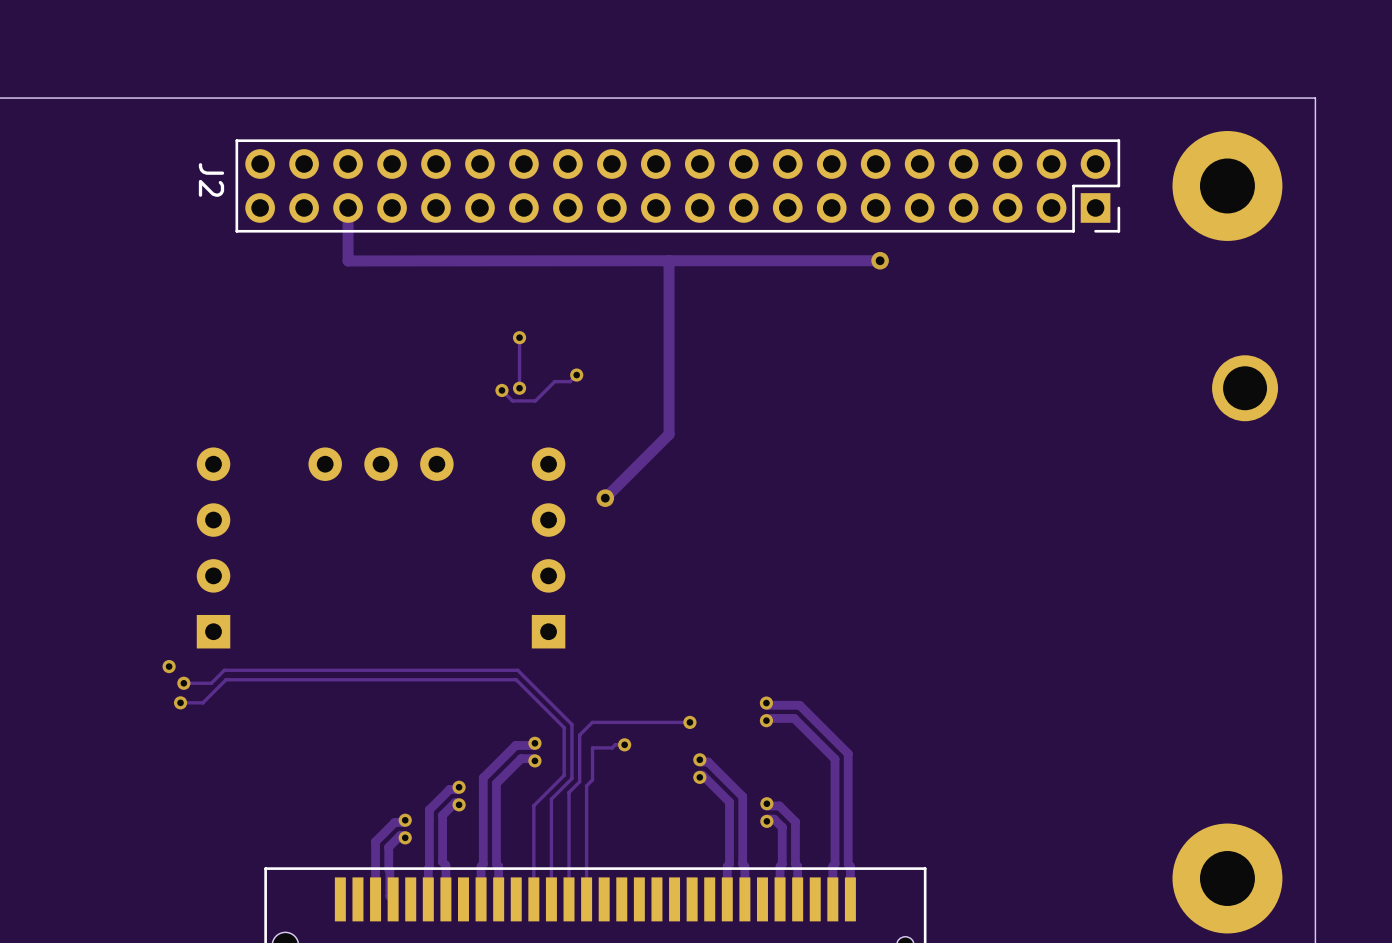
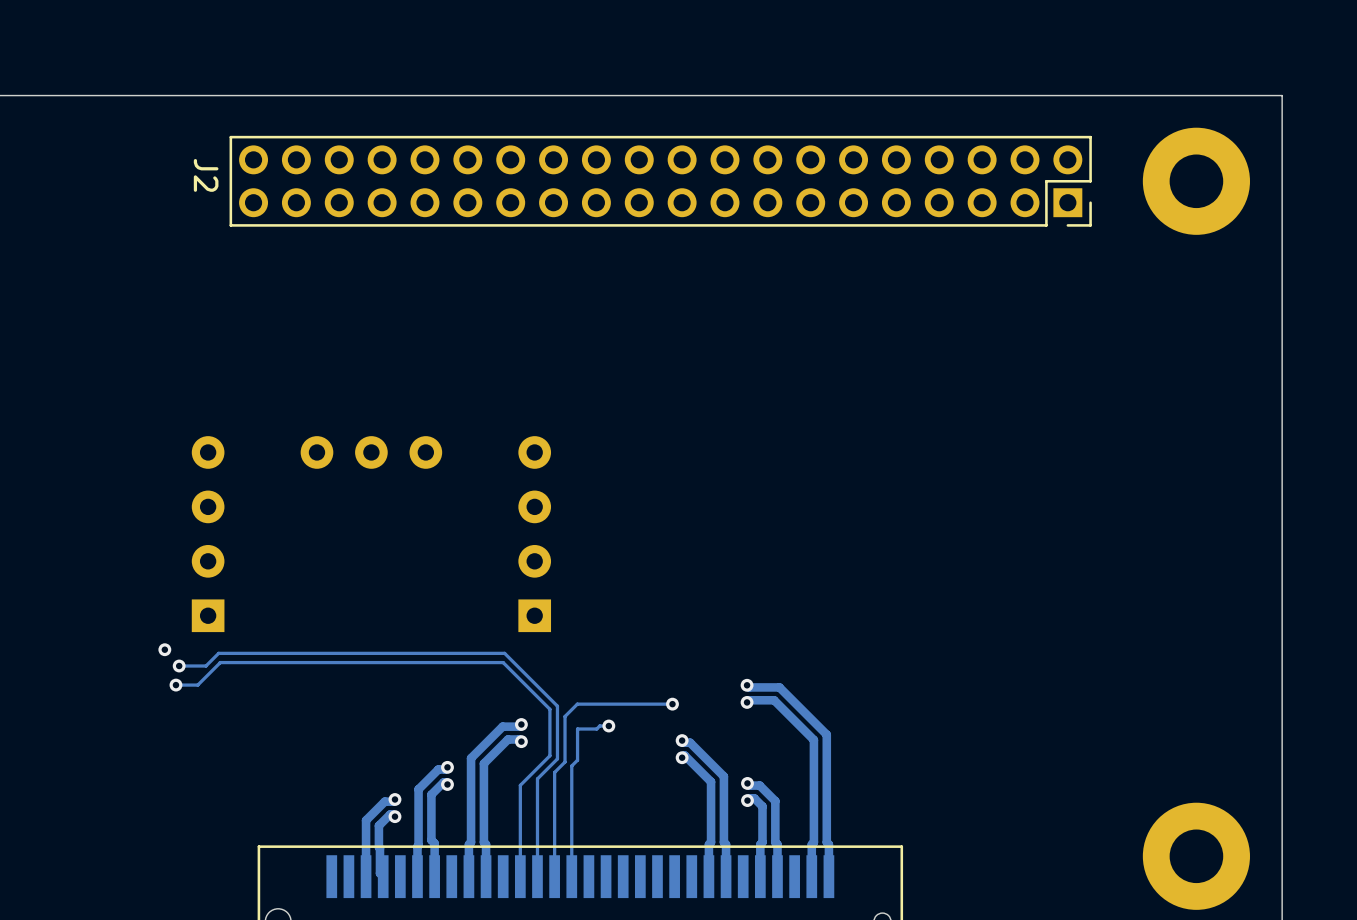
track: (348, 207) (348, 260) (669, 260) -> none
track: (669, 260) (669, 434) (605, 498) -> none
track: (880, 260) (669, 260) -> none
via: (880, 260) -> none
track: (519, 337) (519, 388) -> none
via: (519, 337) -> none
track: (576, 375) (570, 381) (554, 381) (535, 400) (512, 400) (501, 390) -> none
via: (576, 375) -> none
via: (519, 388) -> none
part: (1245, 388) -> none
via: (501, 390) -> none
via: (605, 498) -> none

